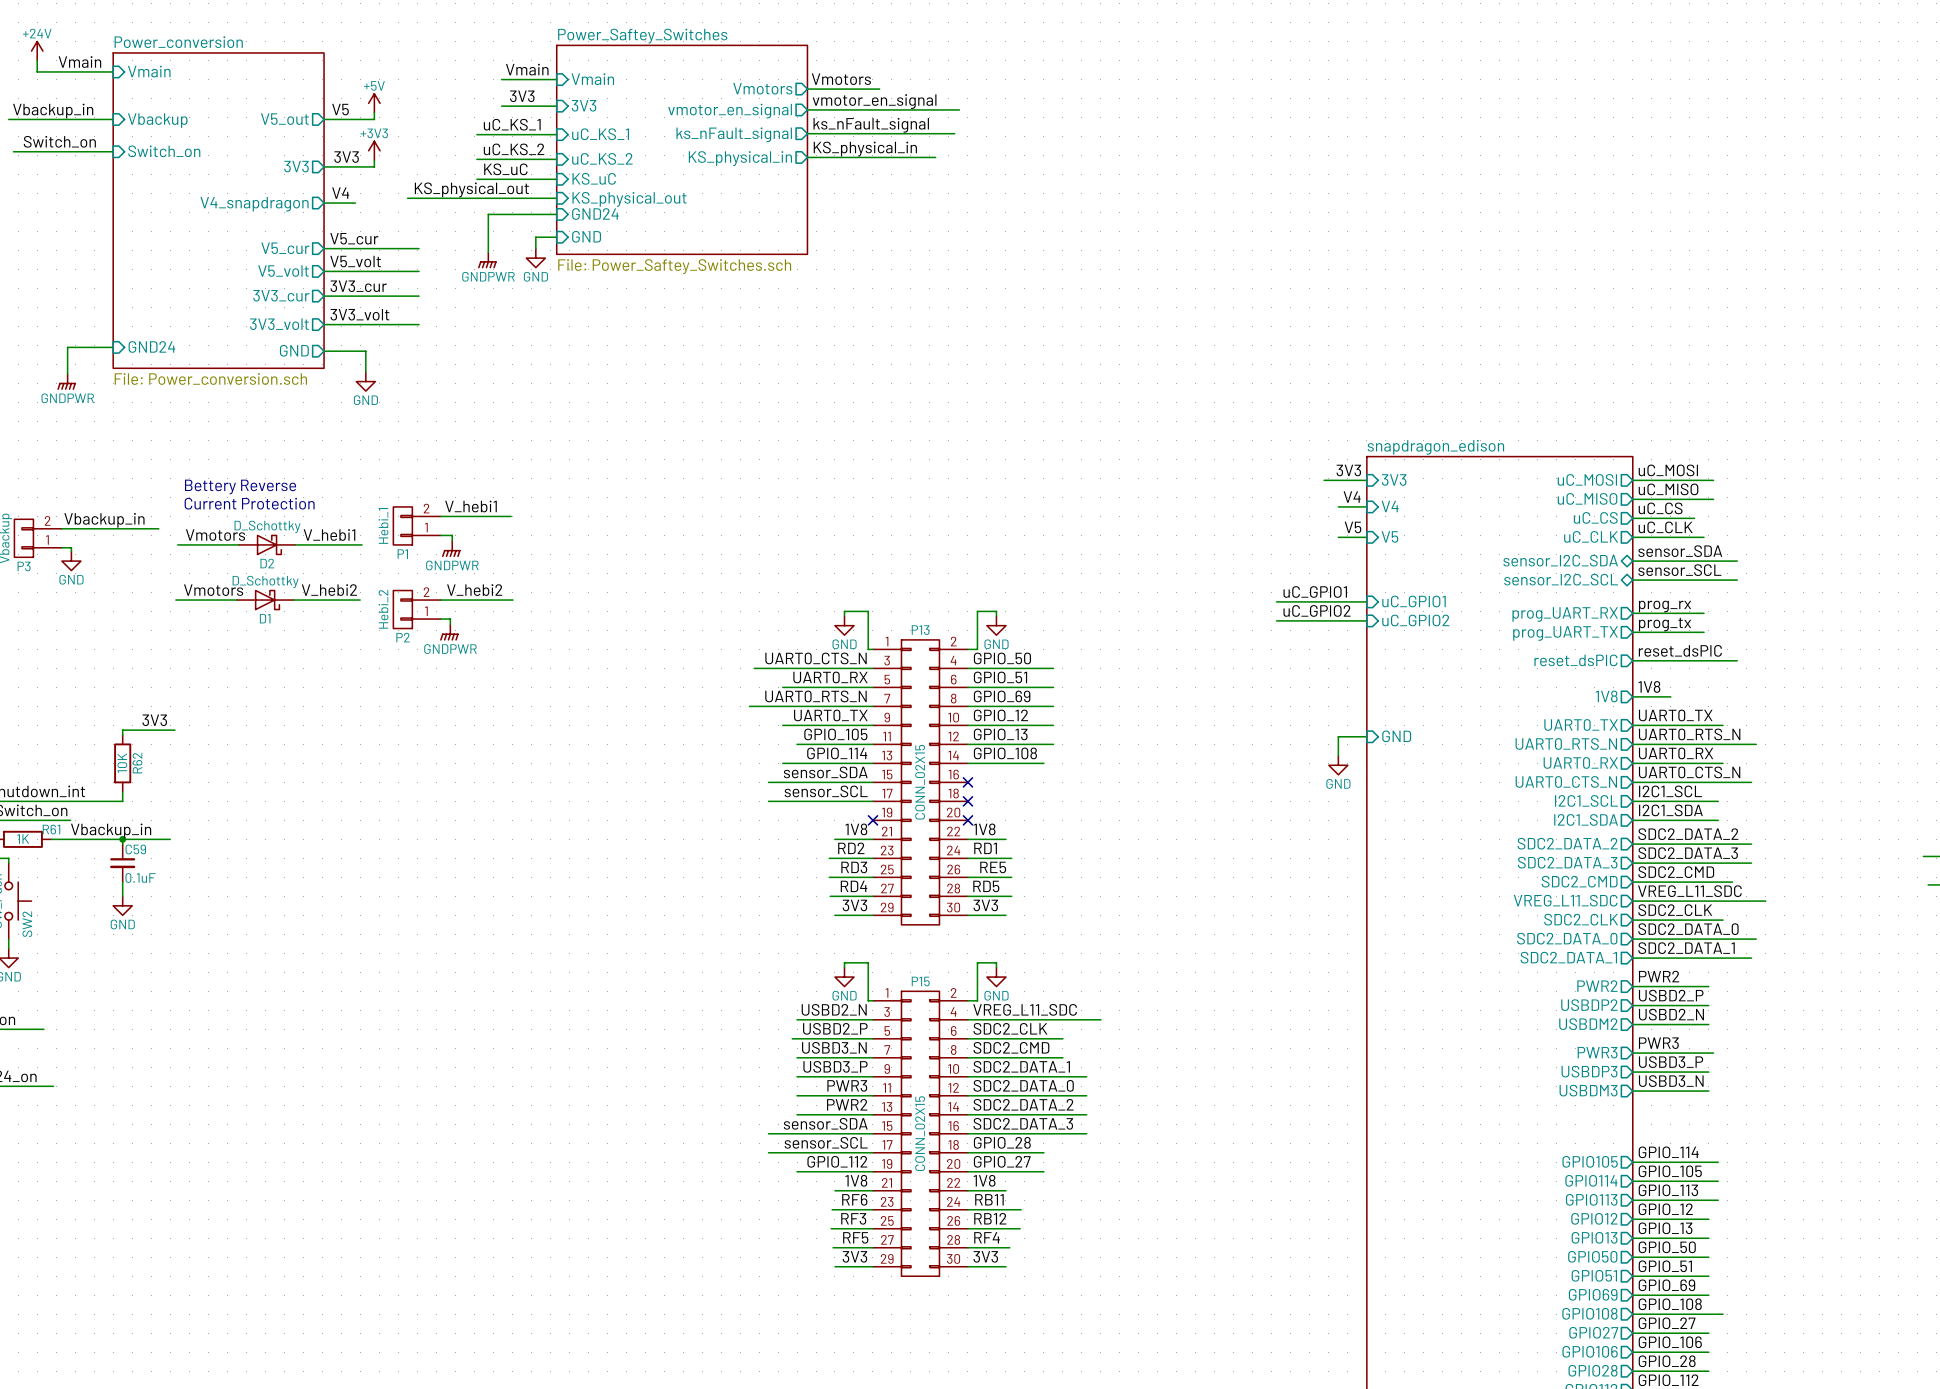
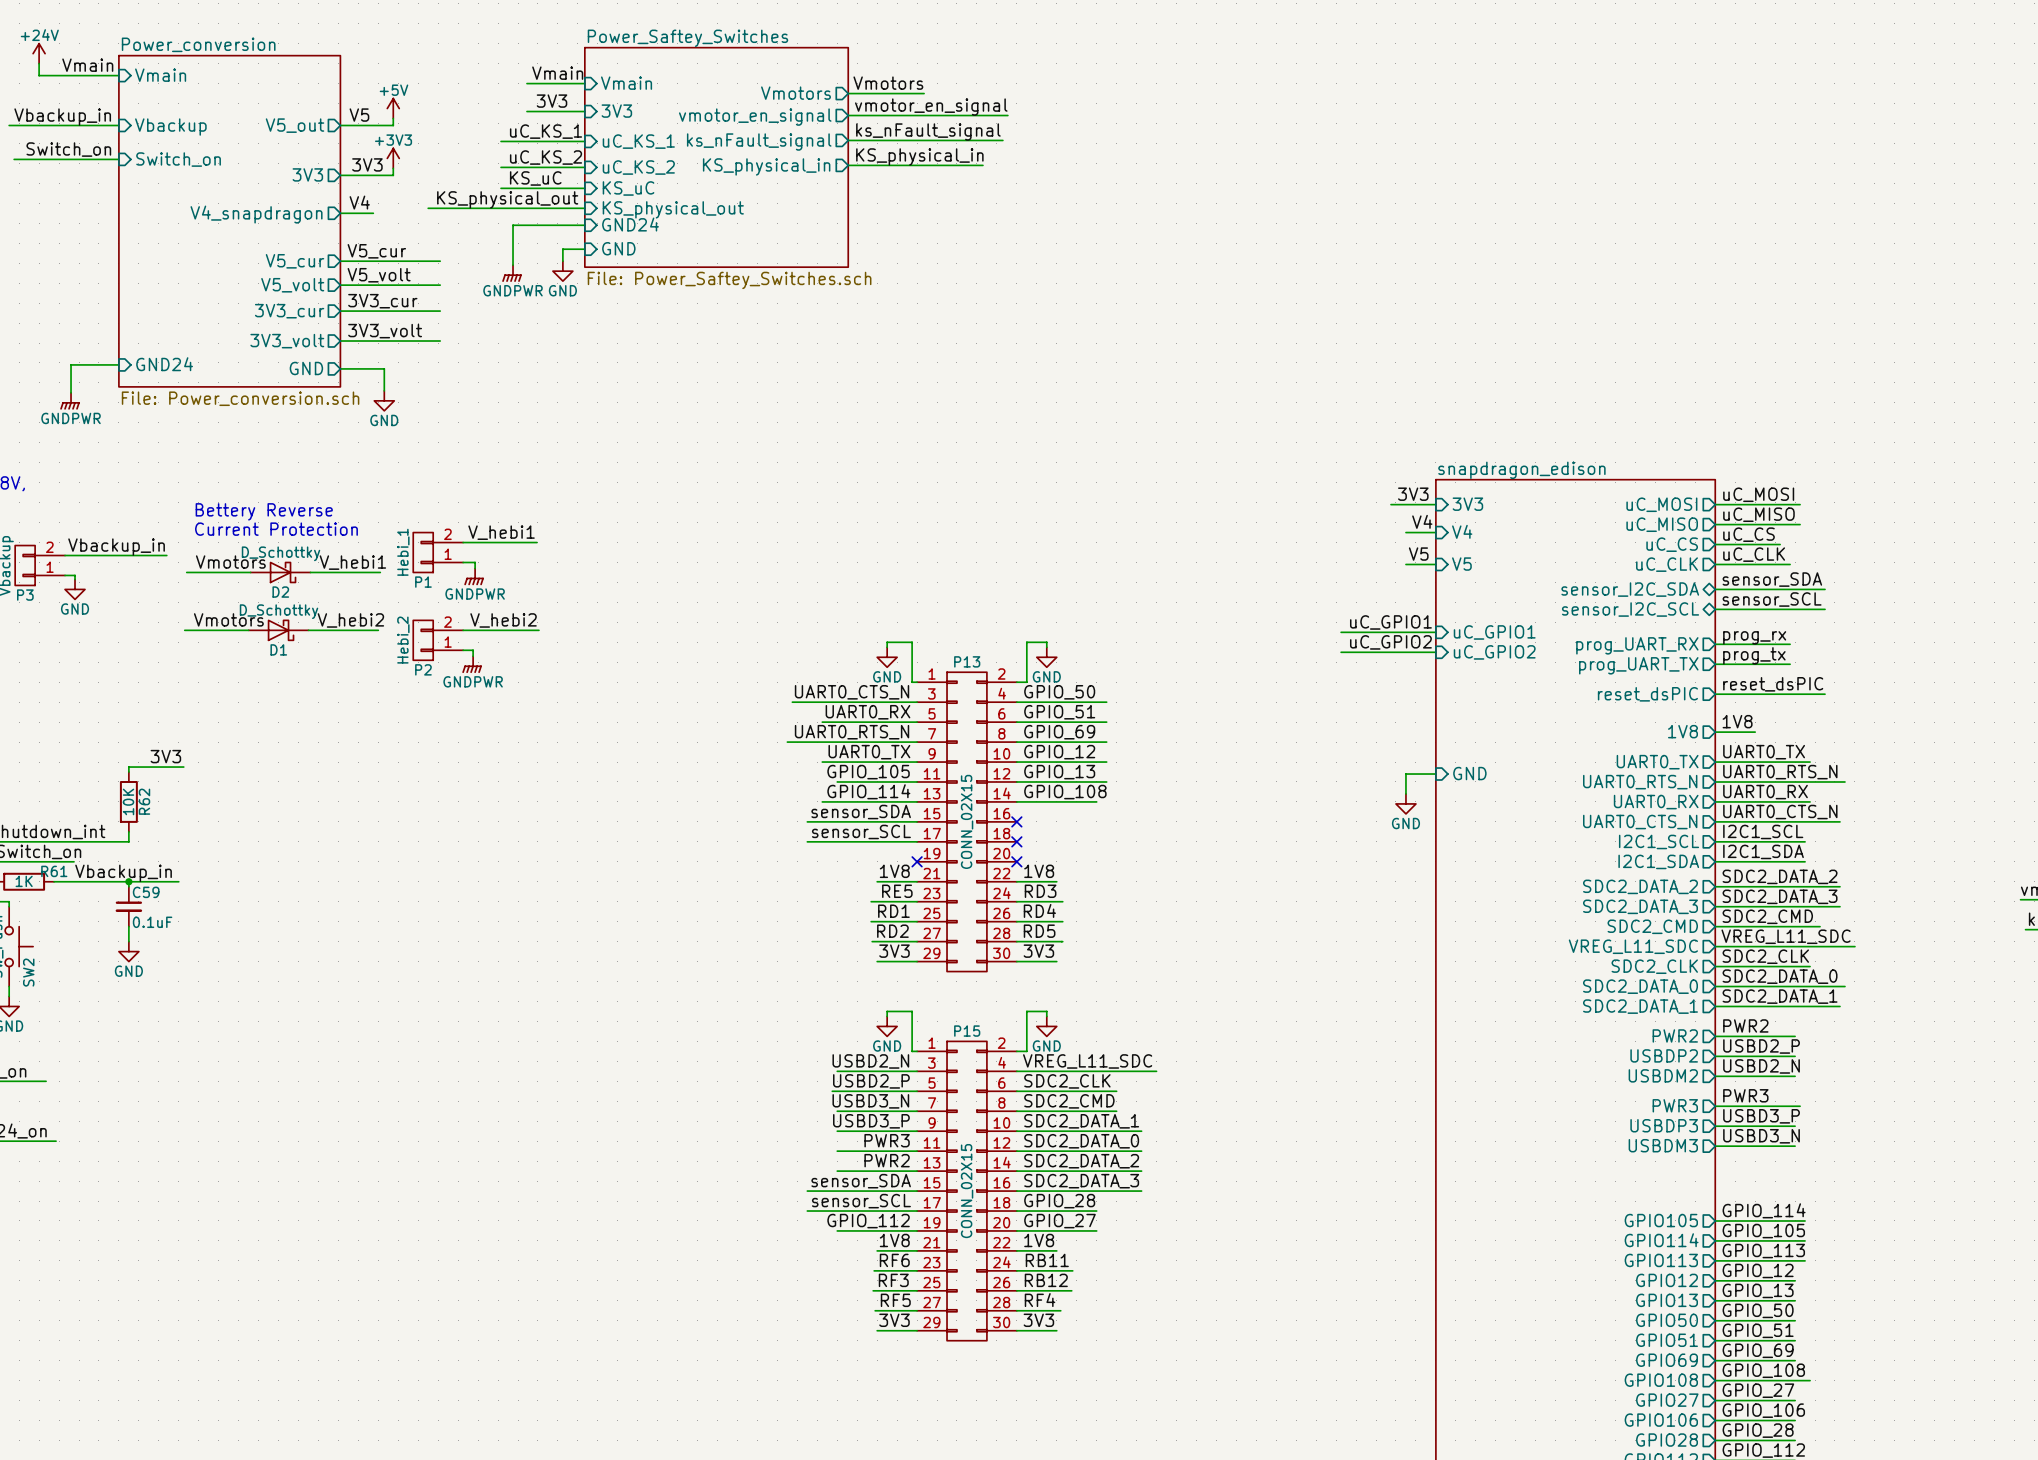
label position: RD2 (851, 848) -> RD2 (892, 931)
label: RD1 (985, 848) -> RD3 (1040, 891)
label: RD3 (854, 867) -> RD1 (893, 911)
label position: RE5 (993, 867) -> RE5 (897, 891)
label position: RD4 (854, 886) -> RD4 (1039, 910)

